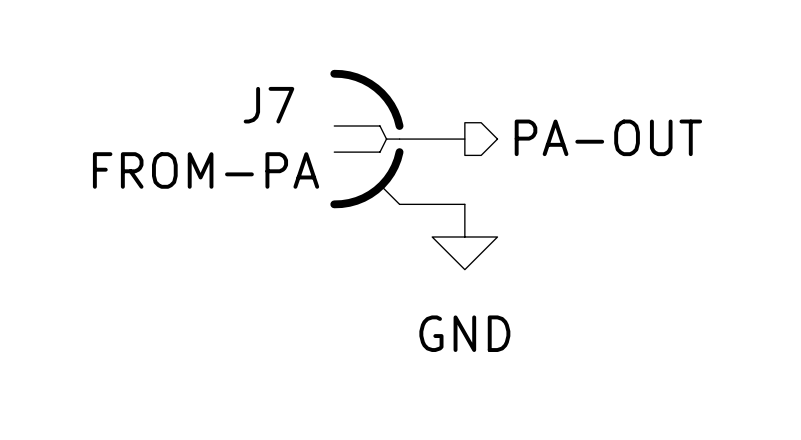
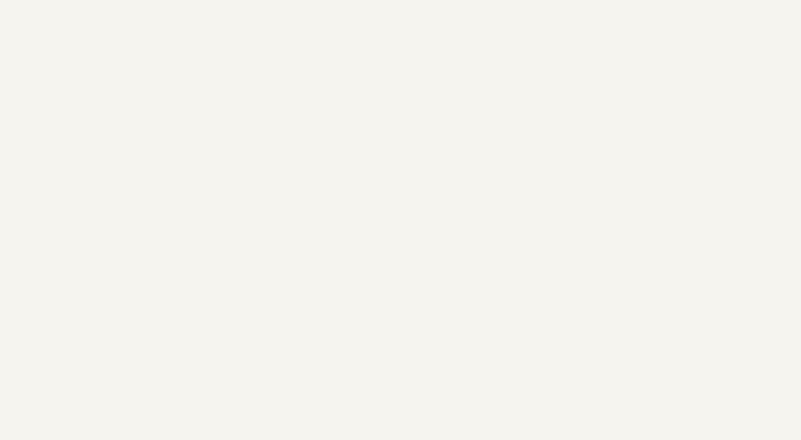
hierarchical label: PA-OUT (608, 137) -> none
J7: FROM-PA (397, 139) -> none
power symbol: GND (464, 236) -> none

